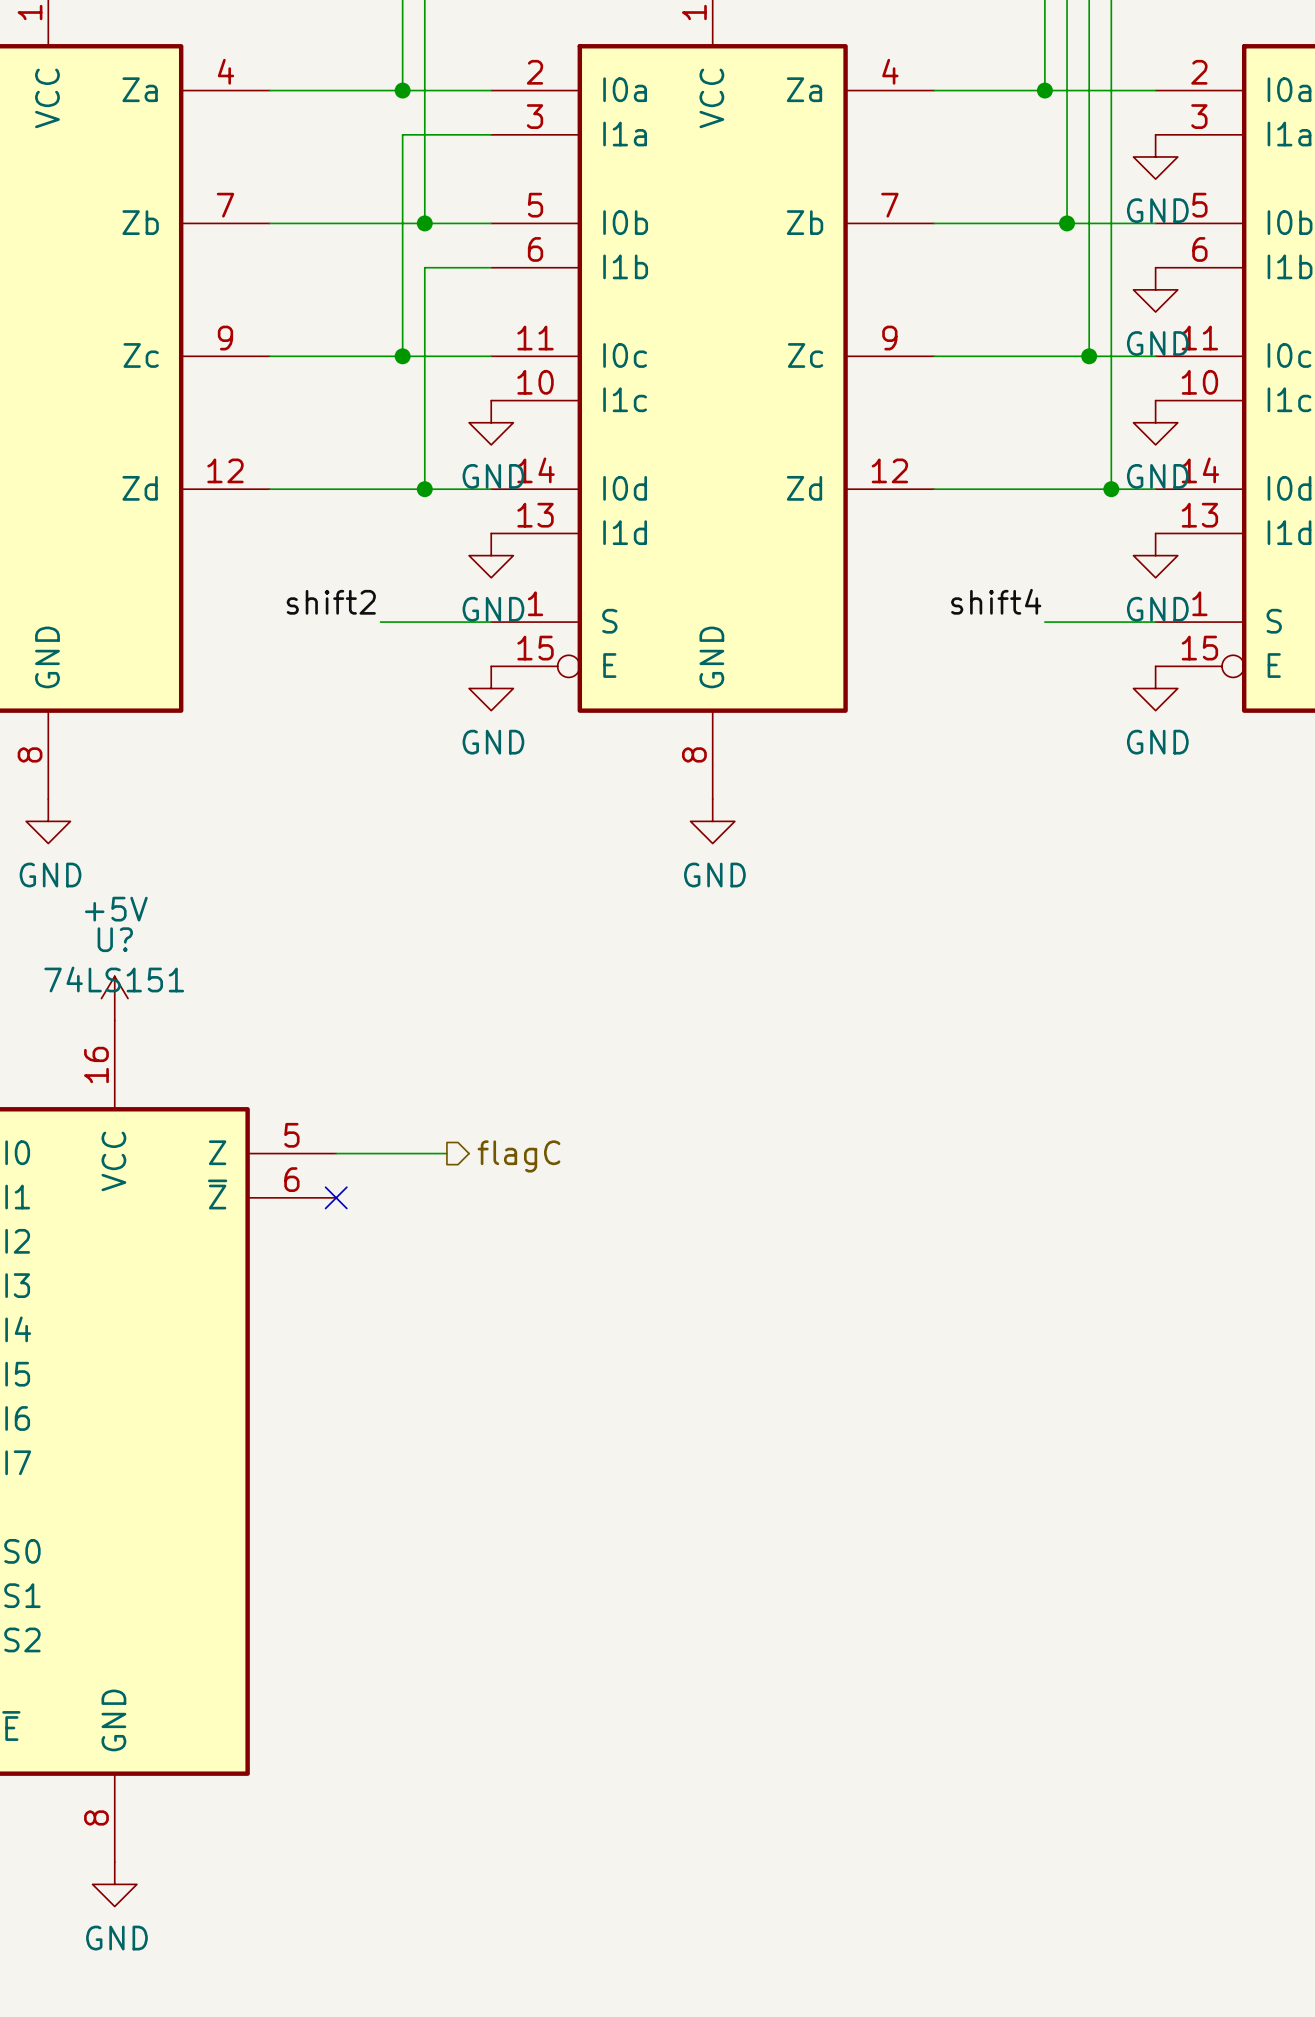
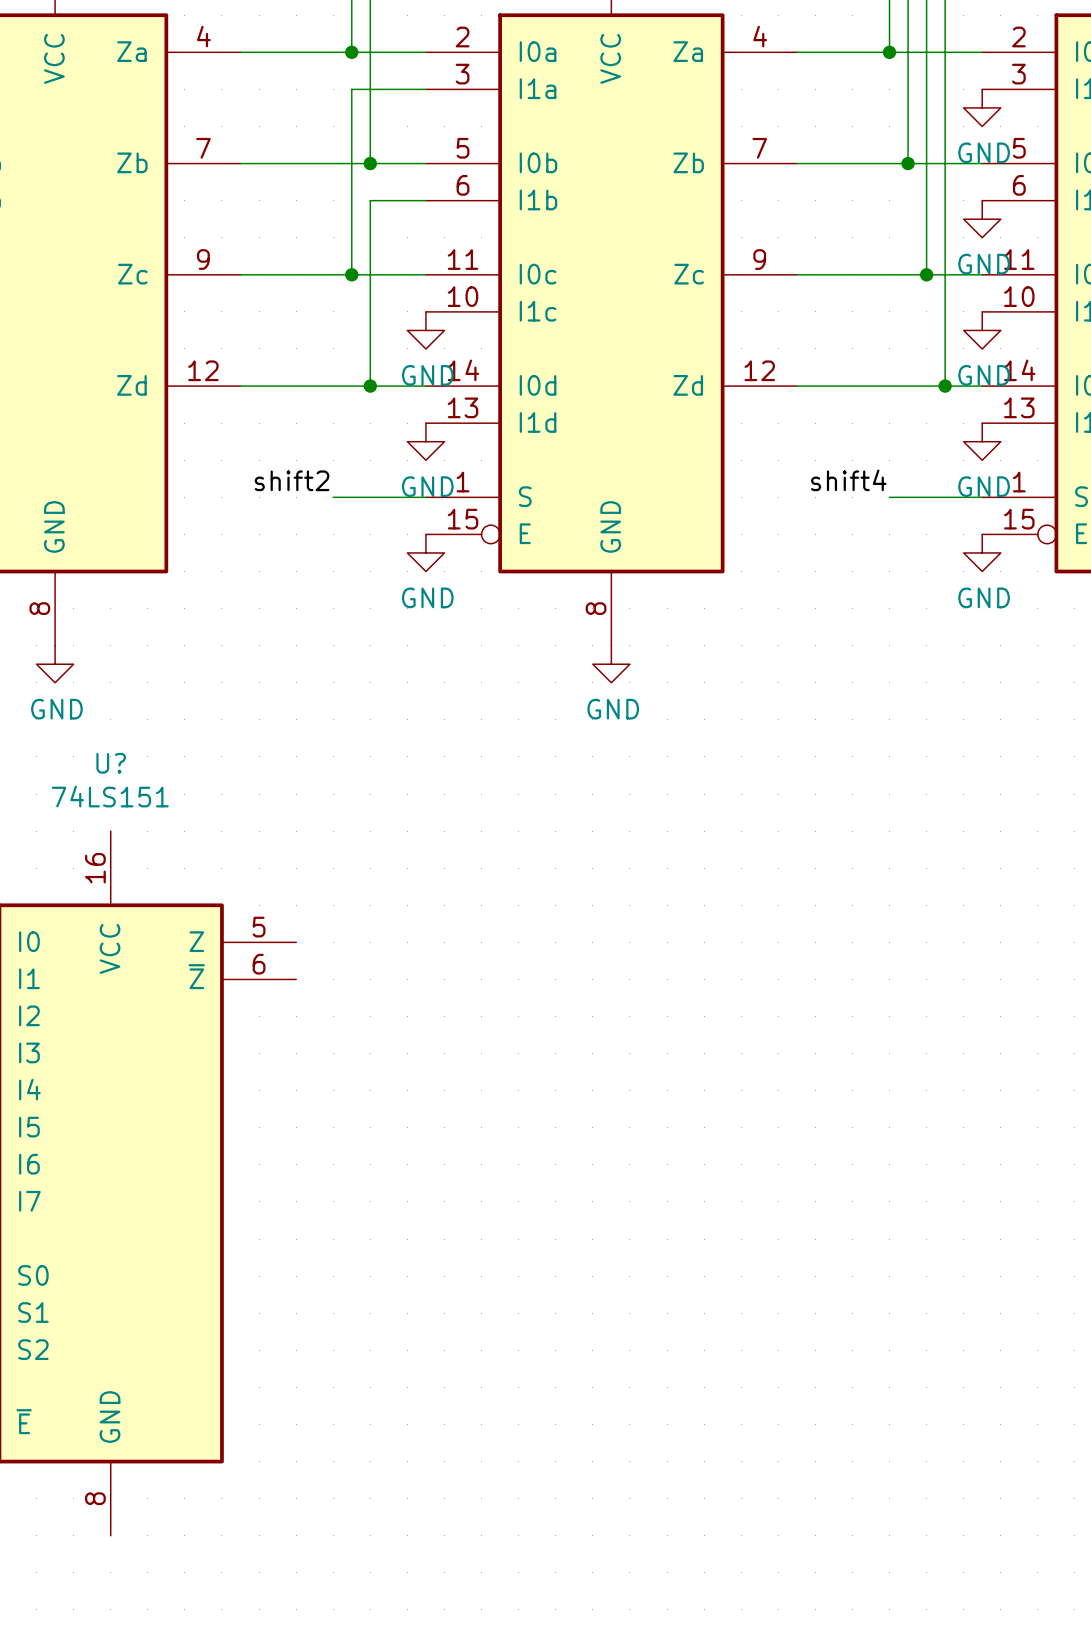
power symbol: +5V (114, 998) -> none
wire: (336, 1153) (446, 1153) -> none
hierarchical label: flagC (518, 1156) -> none
no-connect mark: (336, 1197) -> none
power symbol: GND (114, 1884) -> none

